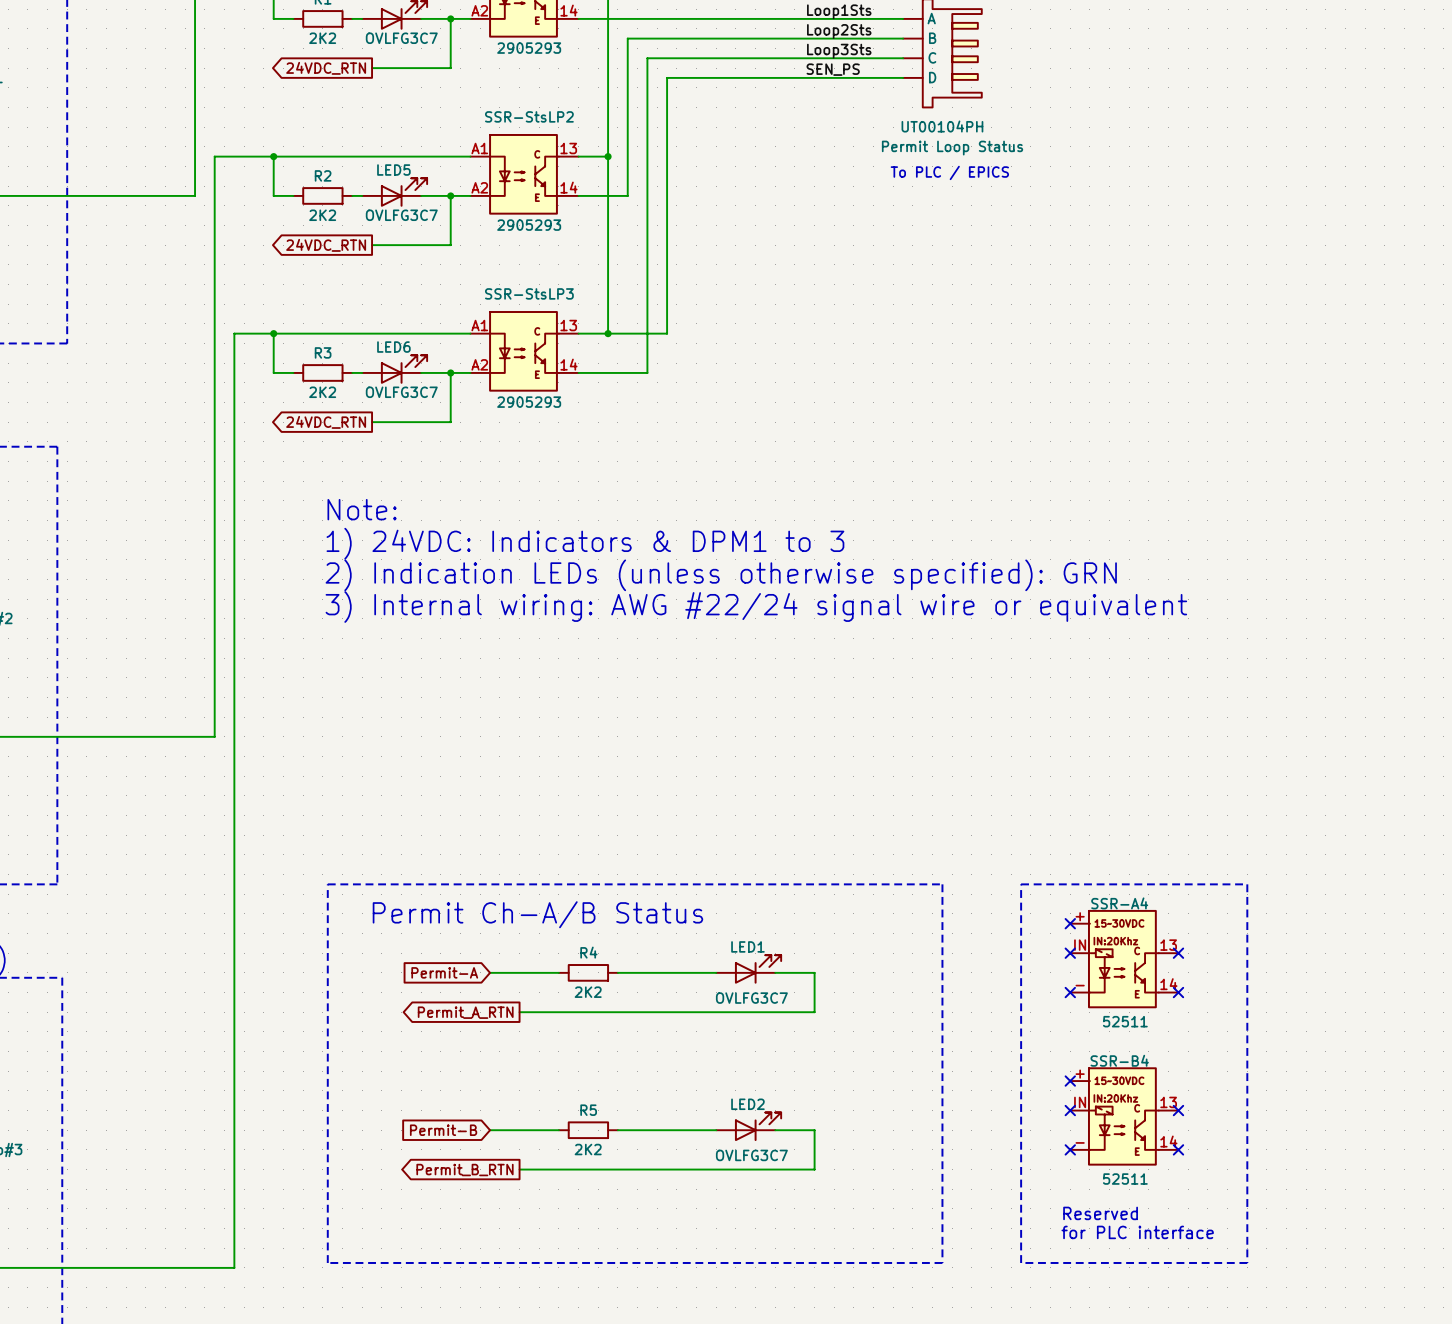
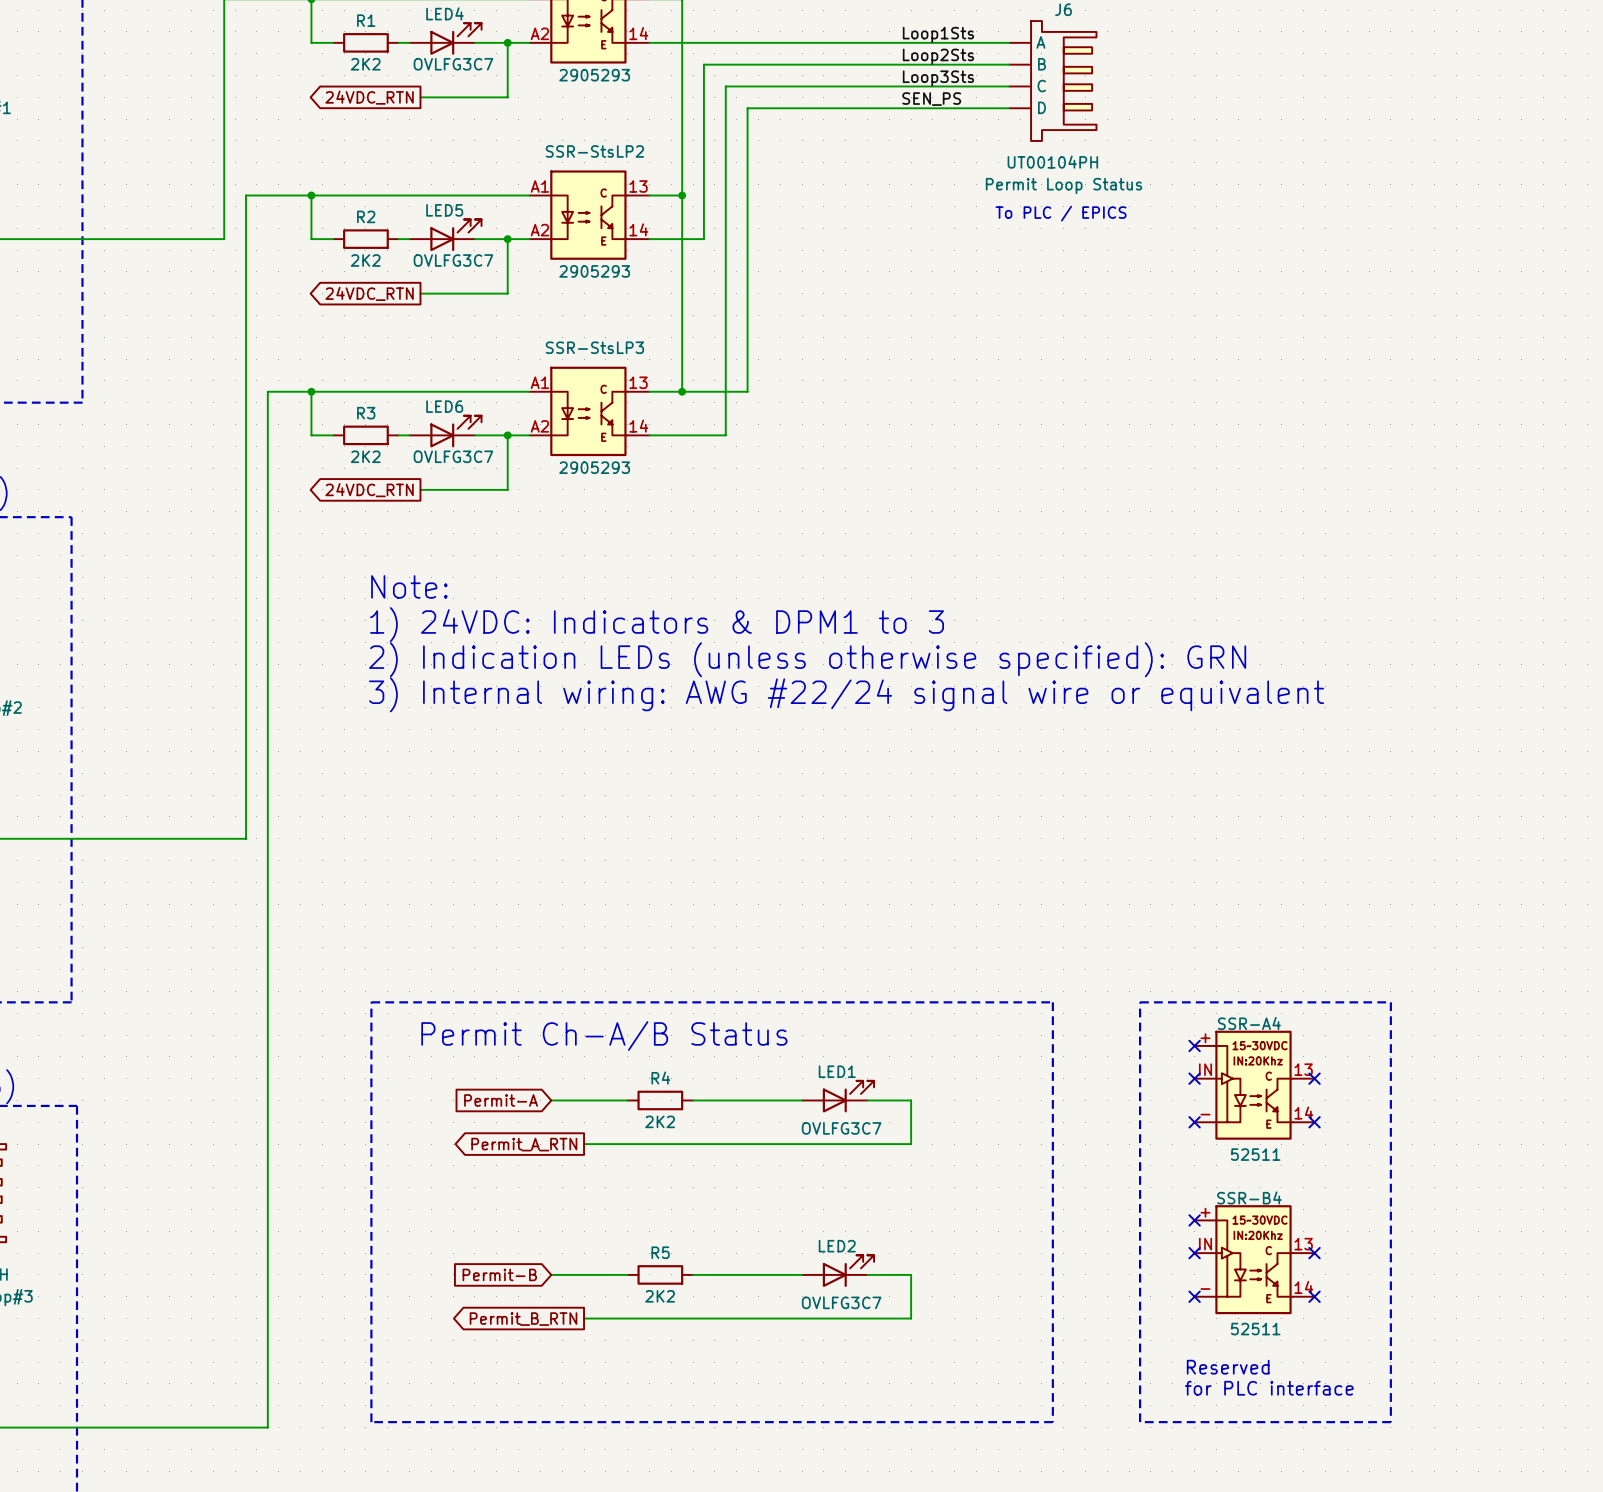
SSR-A4 symbol: [1070, 909, 1179, 1009] -> [1194, 1030, 1315, 1140]
SSR-B4 symbol: [1070, 1067, 1179, 1166] -> [1194, 1205, 1315, 1315]

